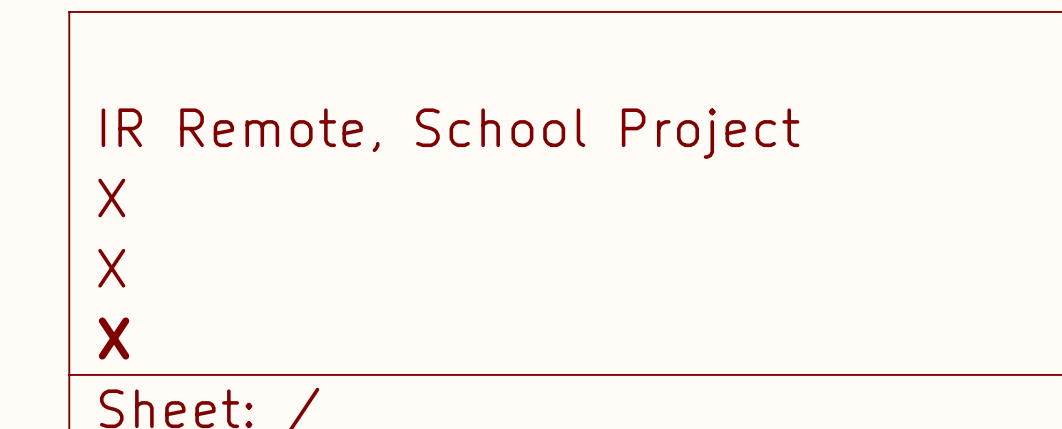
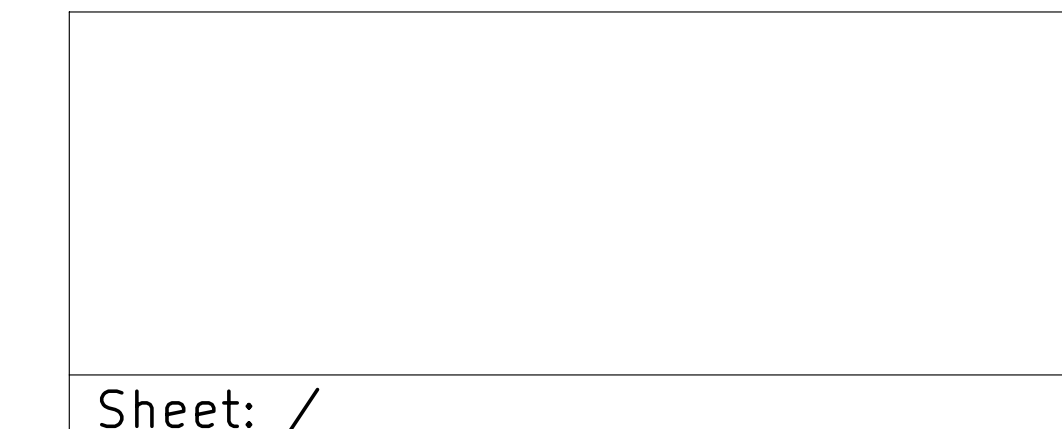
title block: IR Remote, School Project (450, 133) -> none
title block: X (111, 198) -> none
title block: X (111, 268) -> none
title block: X (114, 338) -> none

